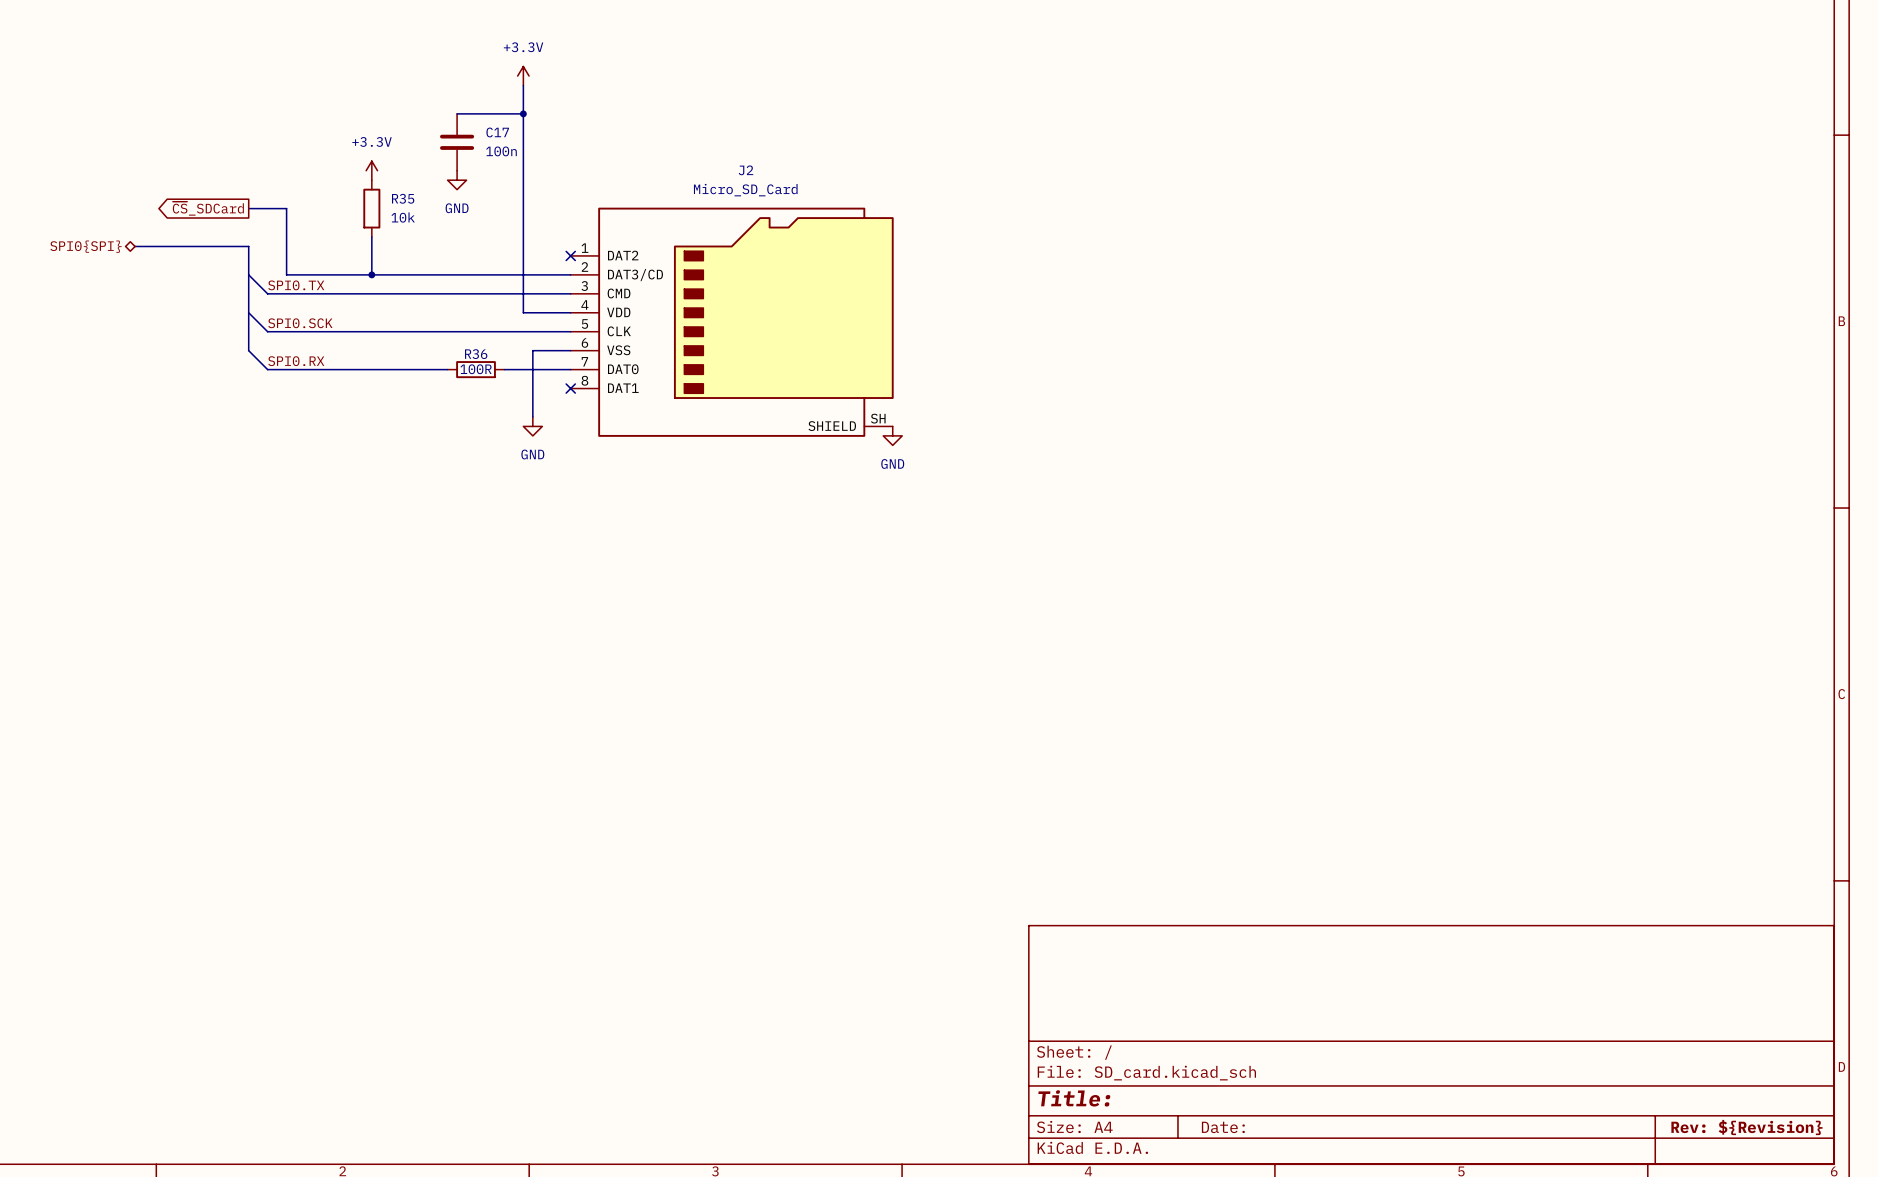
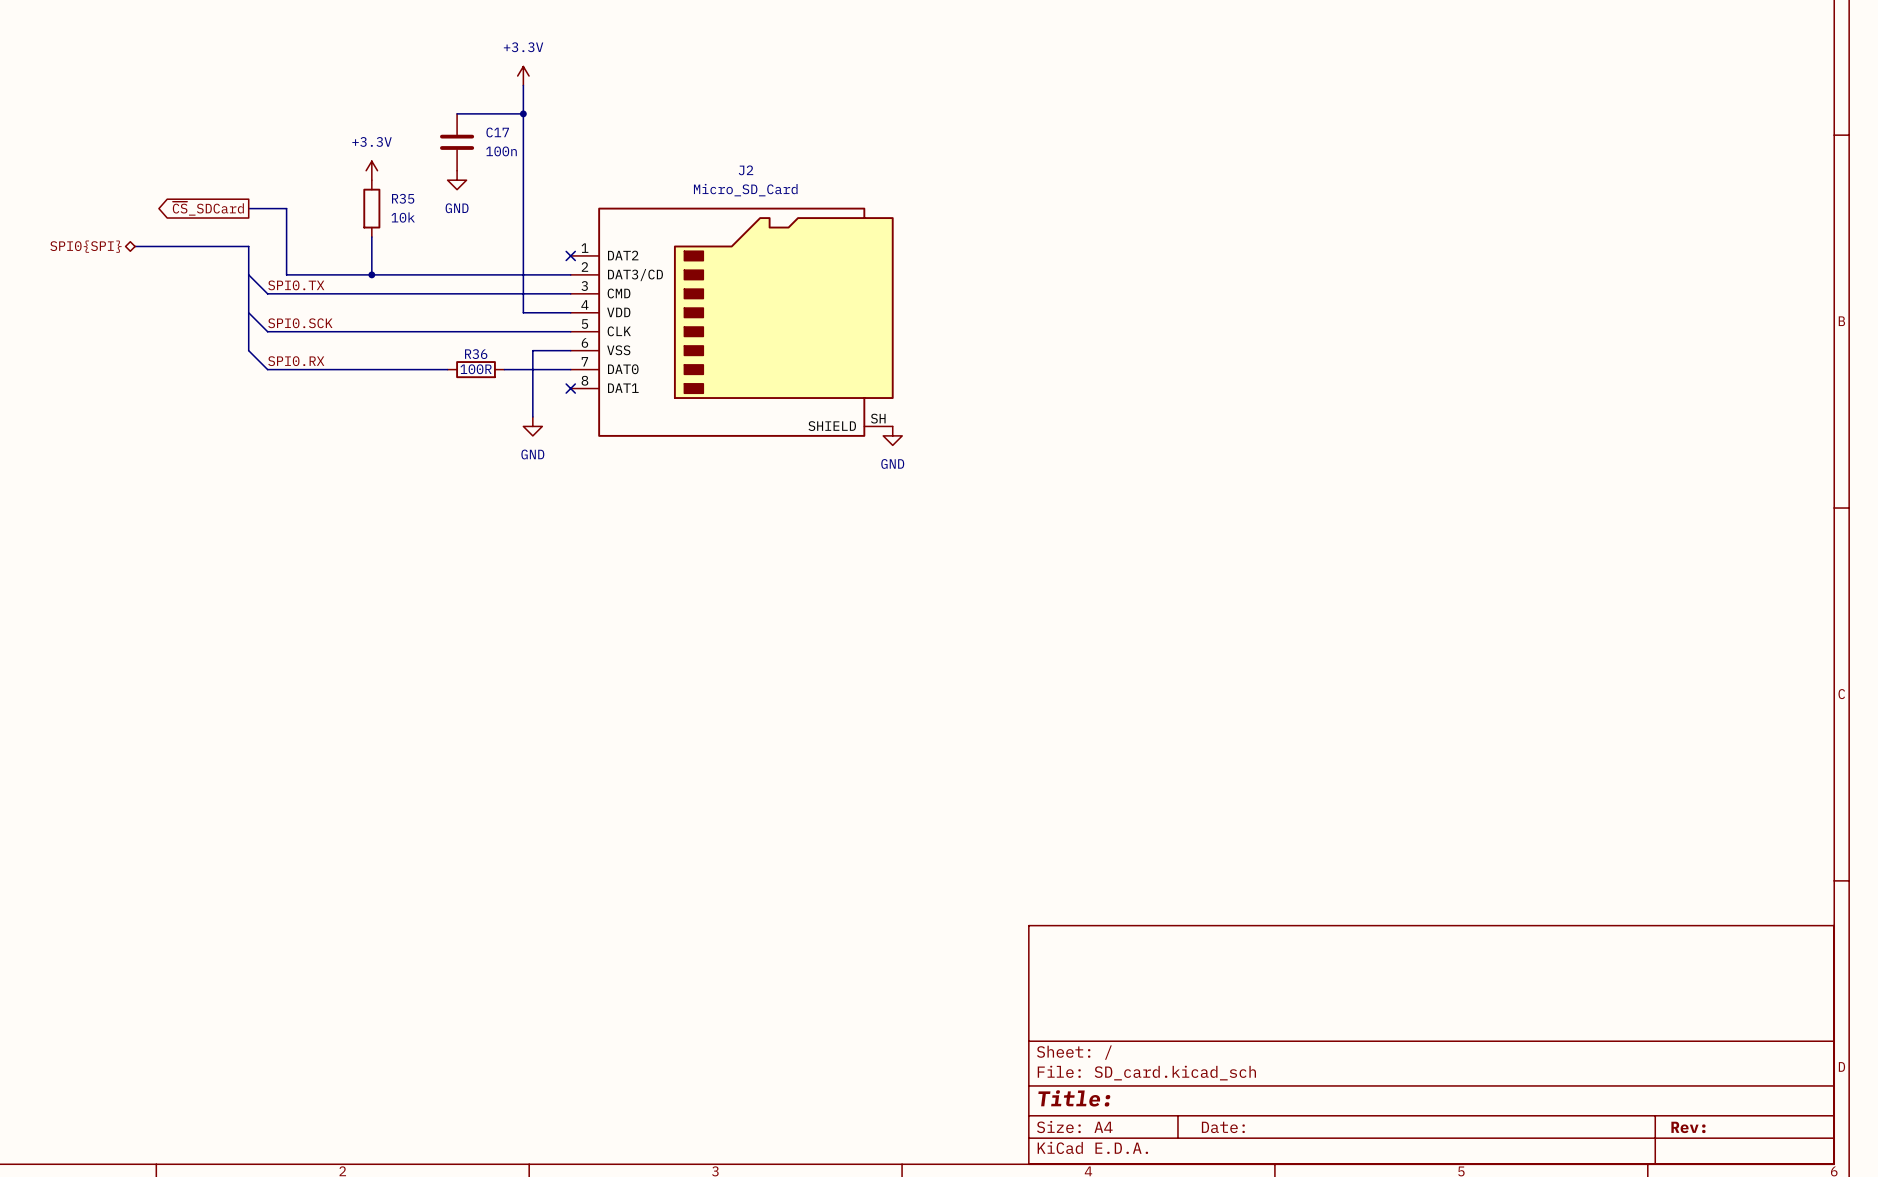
title block: Rev: ${Revision} (1746, 1127) -> Rev: (1688, 1127)

